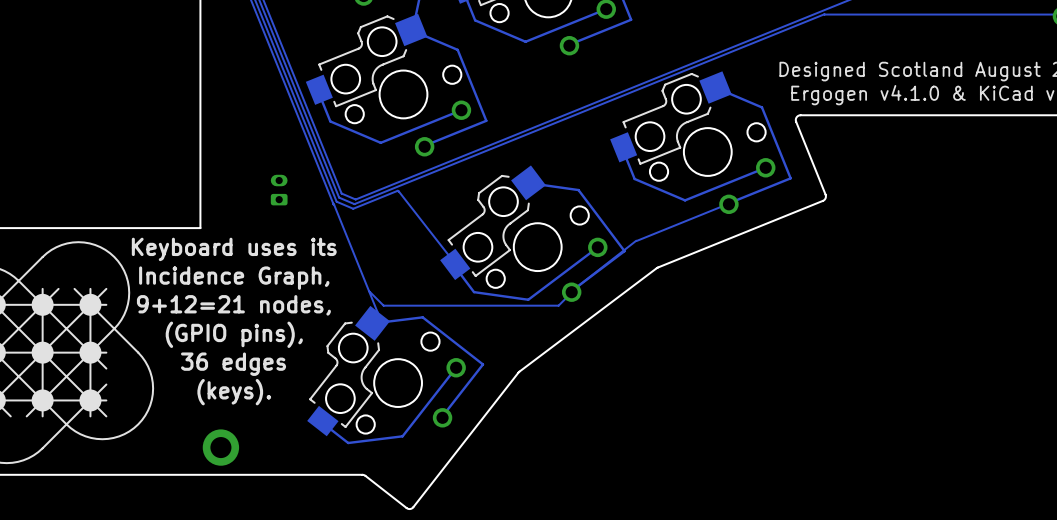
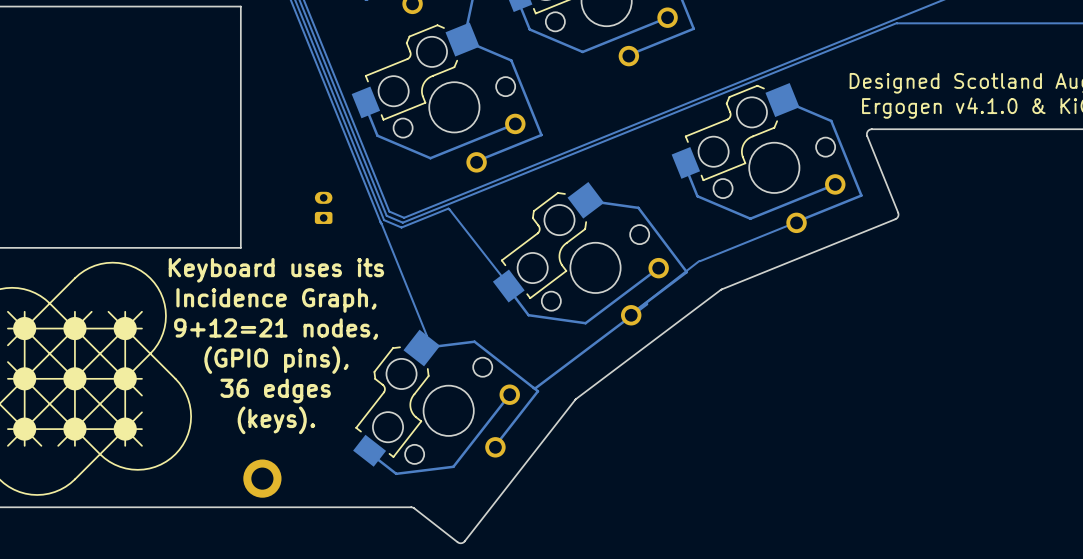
track: none -> (647, 304) (533, 388)
track: (368, 291) (383, 305) (558, 305) (571, 292) -> none

